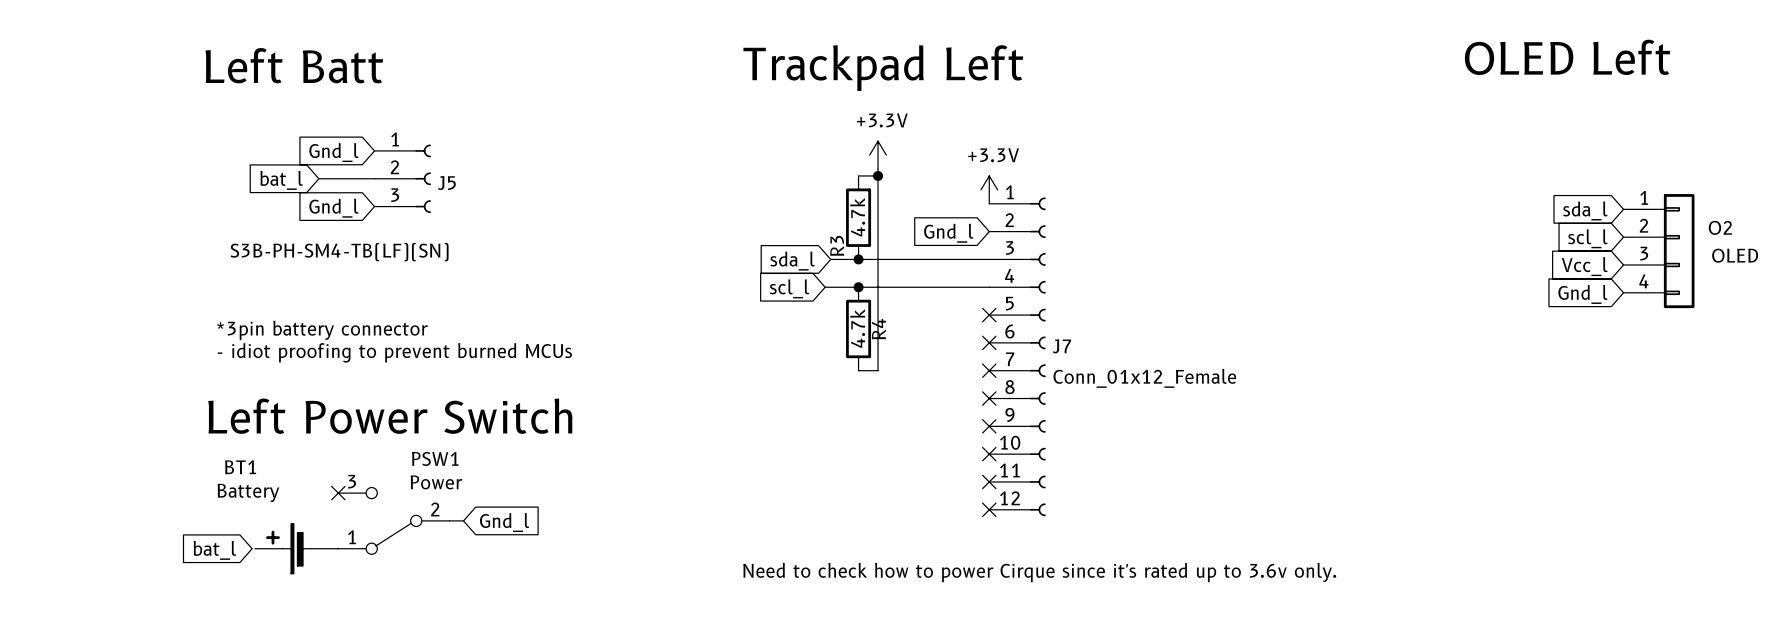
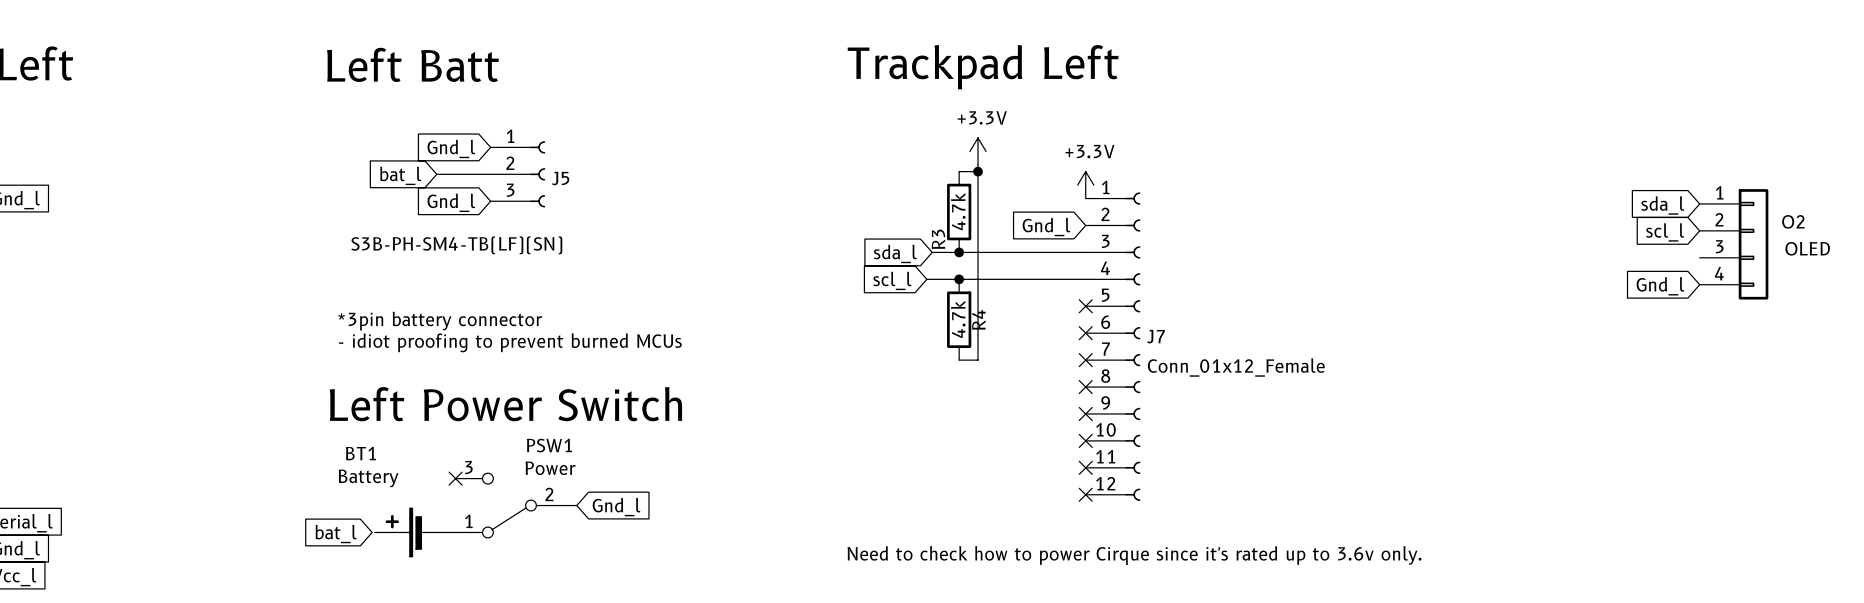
text: OLED Left (1567, 57) -> none
global label: Vcc_l (1584, 266) -> none

